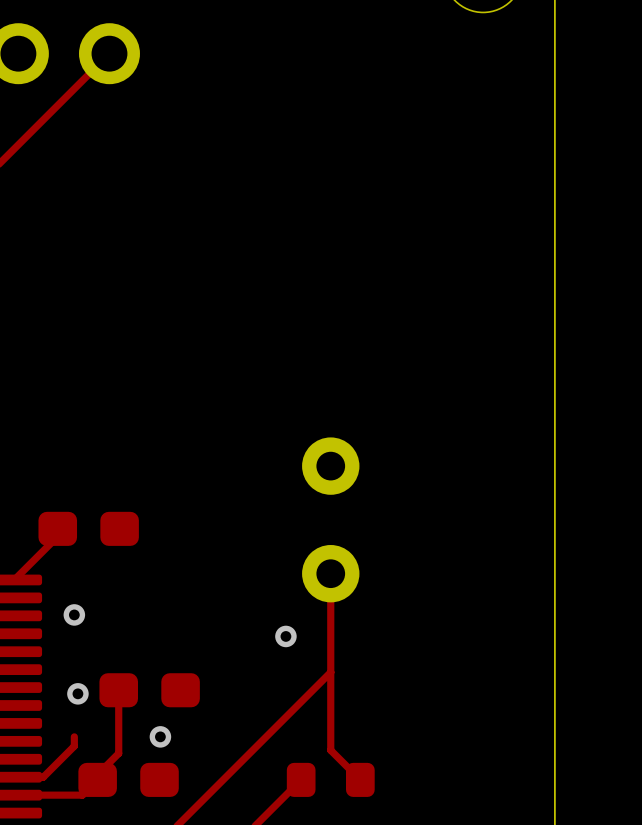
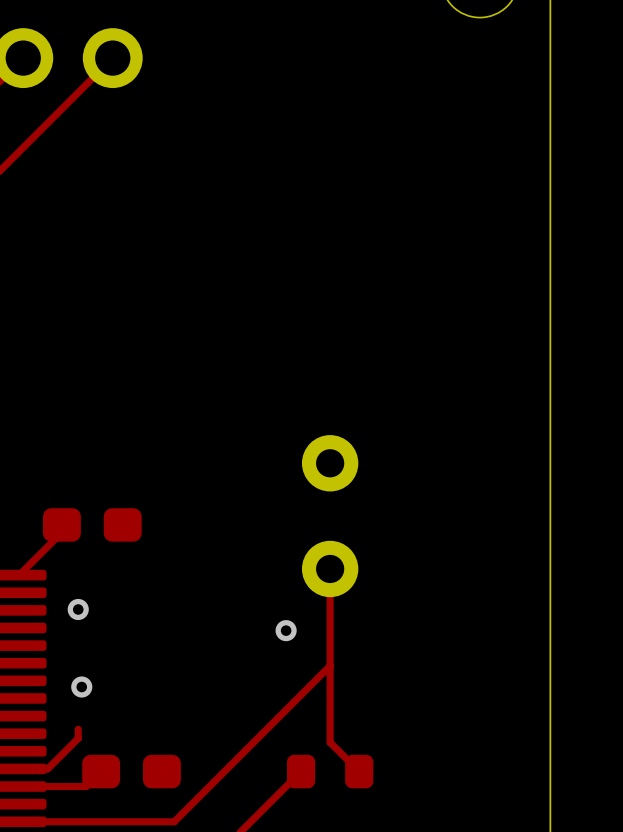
top track: (118, 690) (118, 753) (97, 774) (97, 779) -> none
part: (149, 690) -> none
via: (160, 736) -> none

